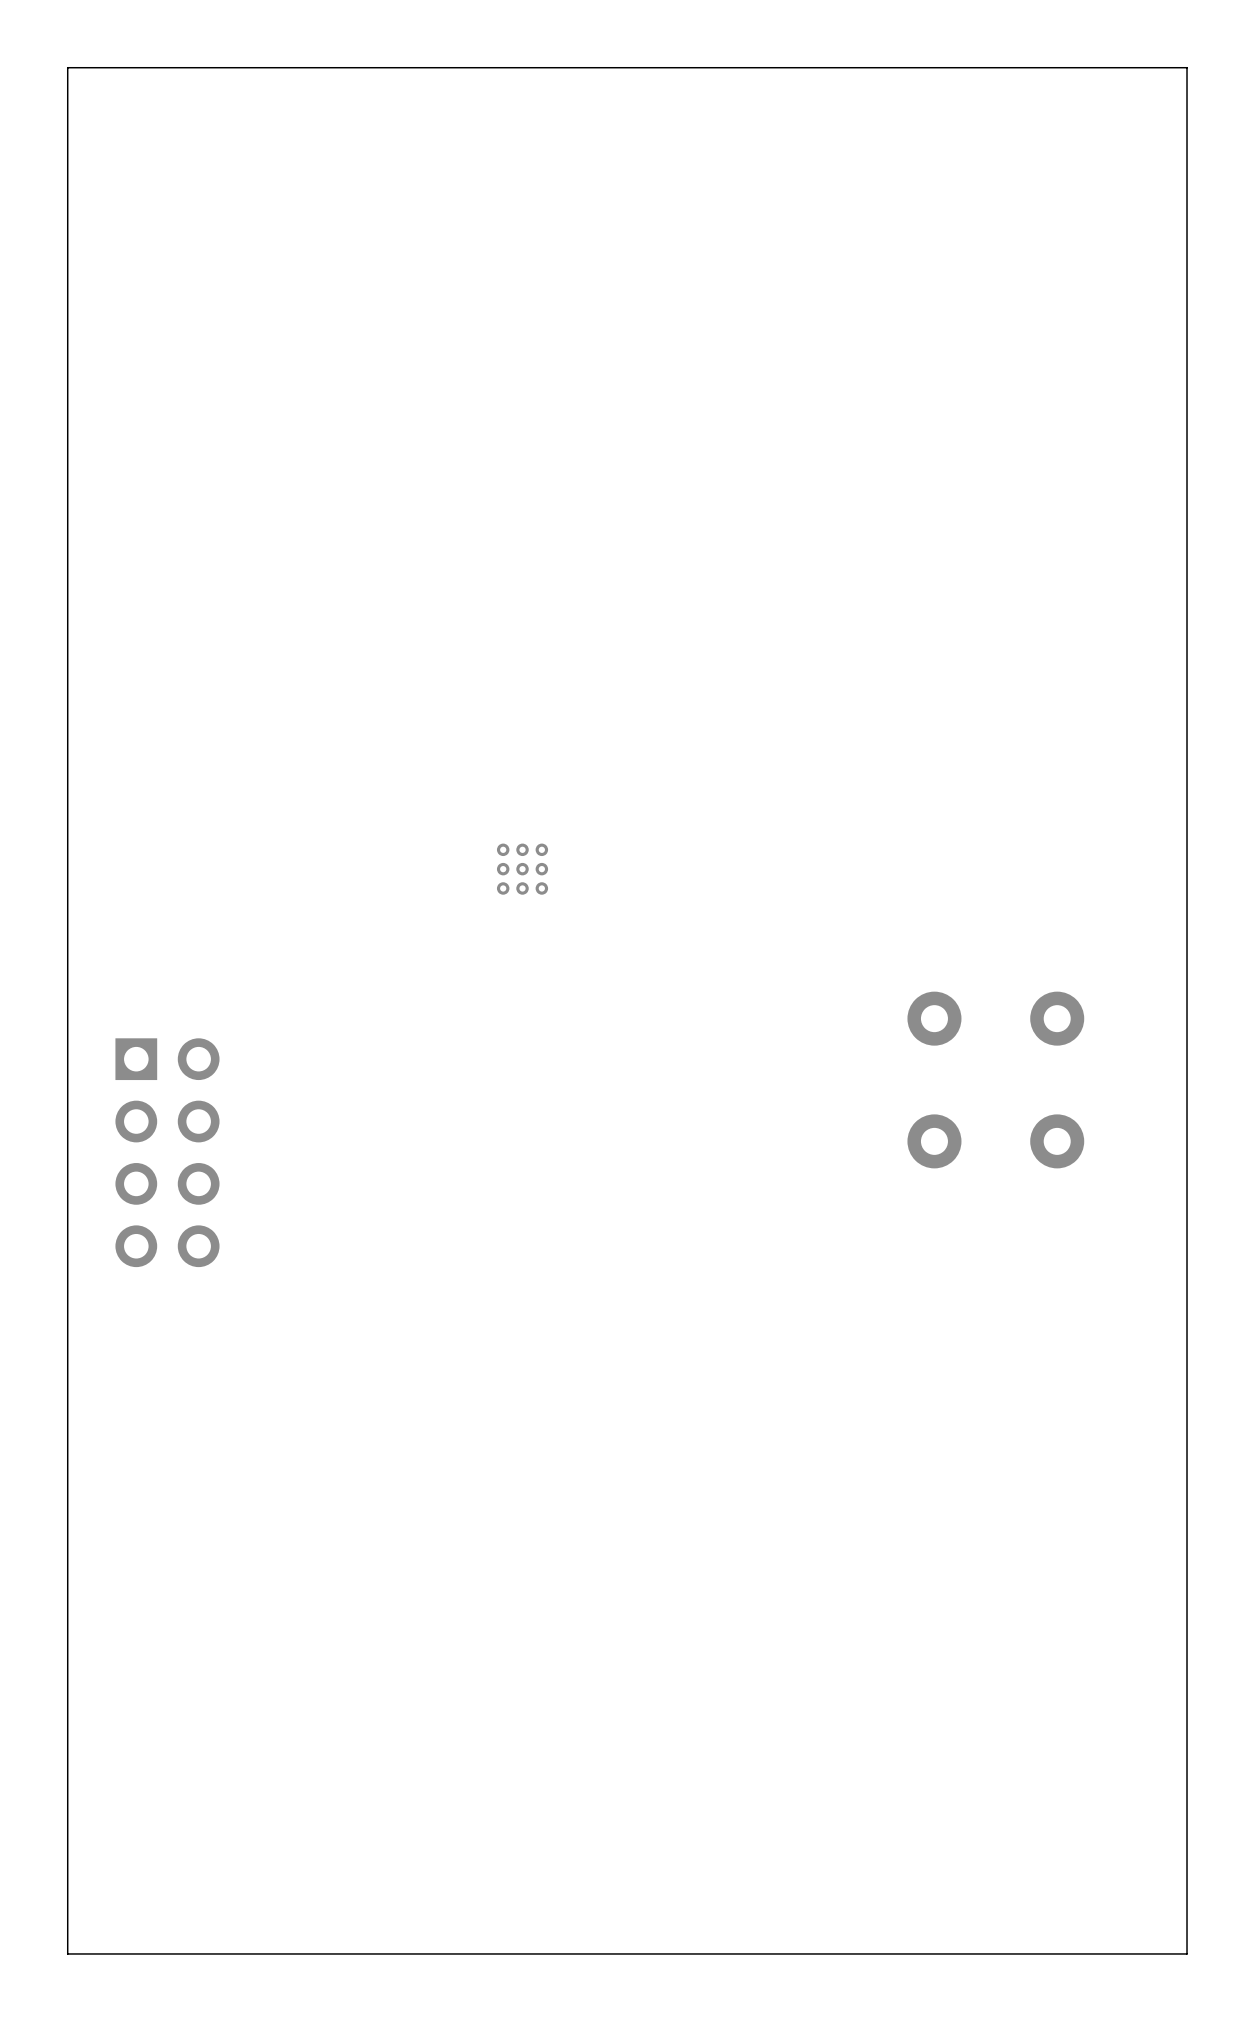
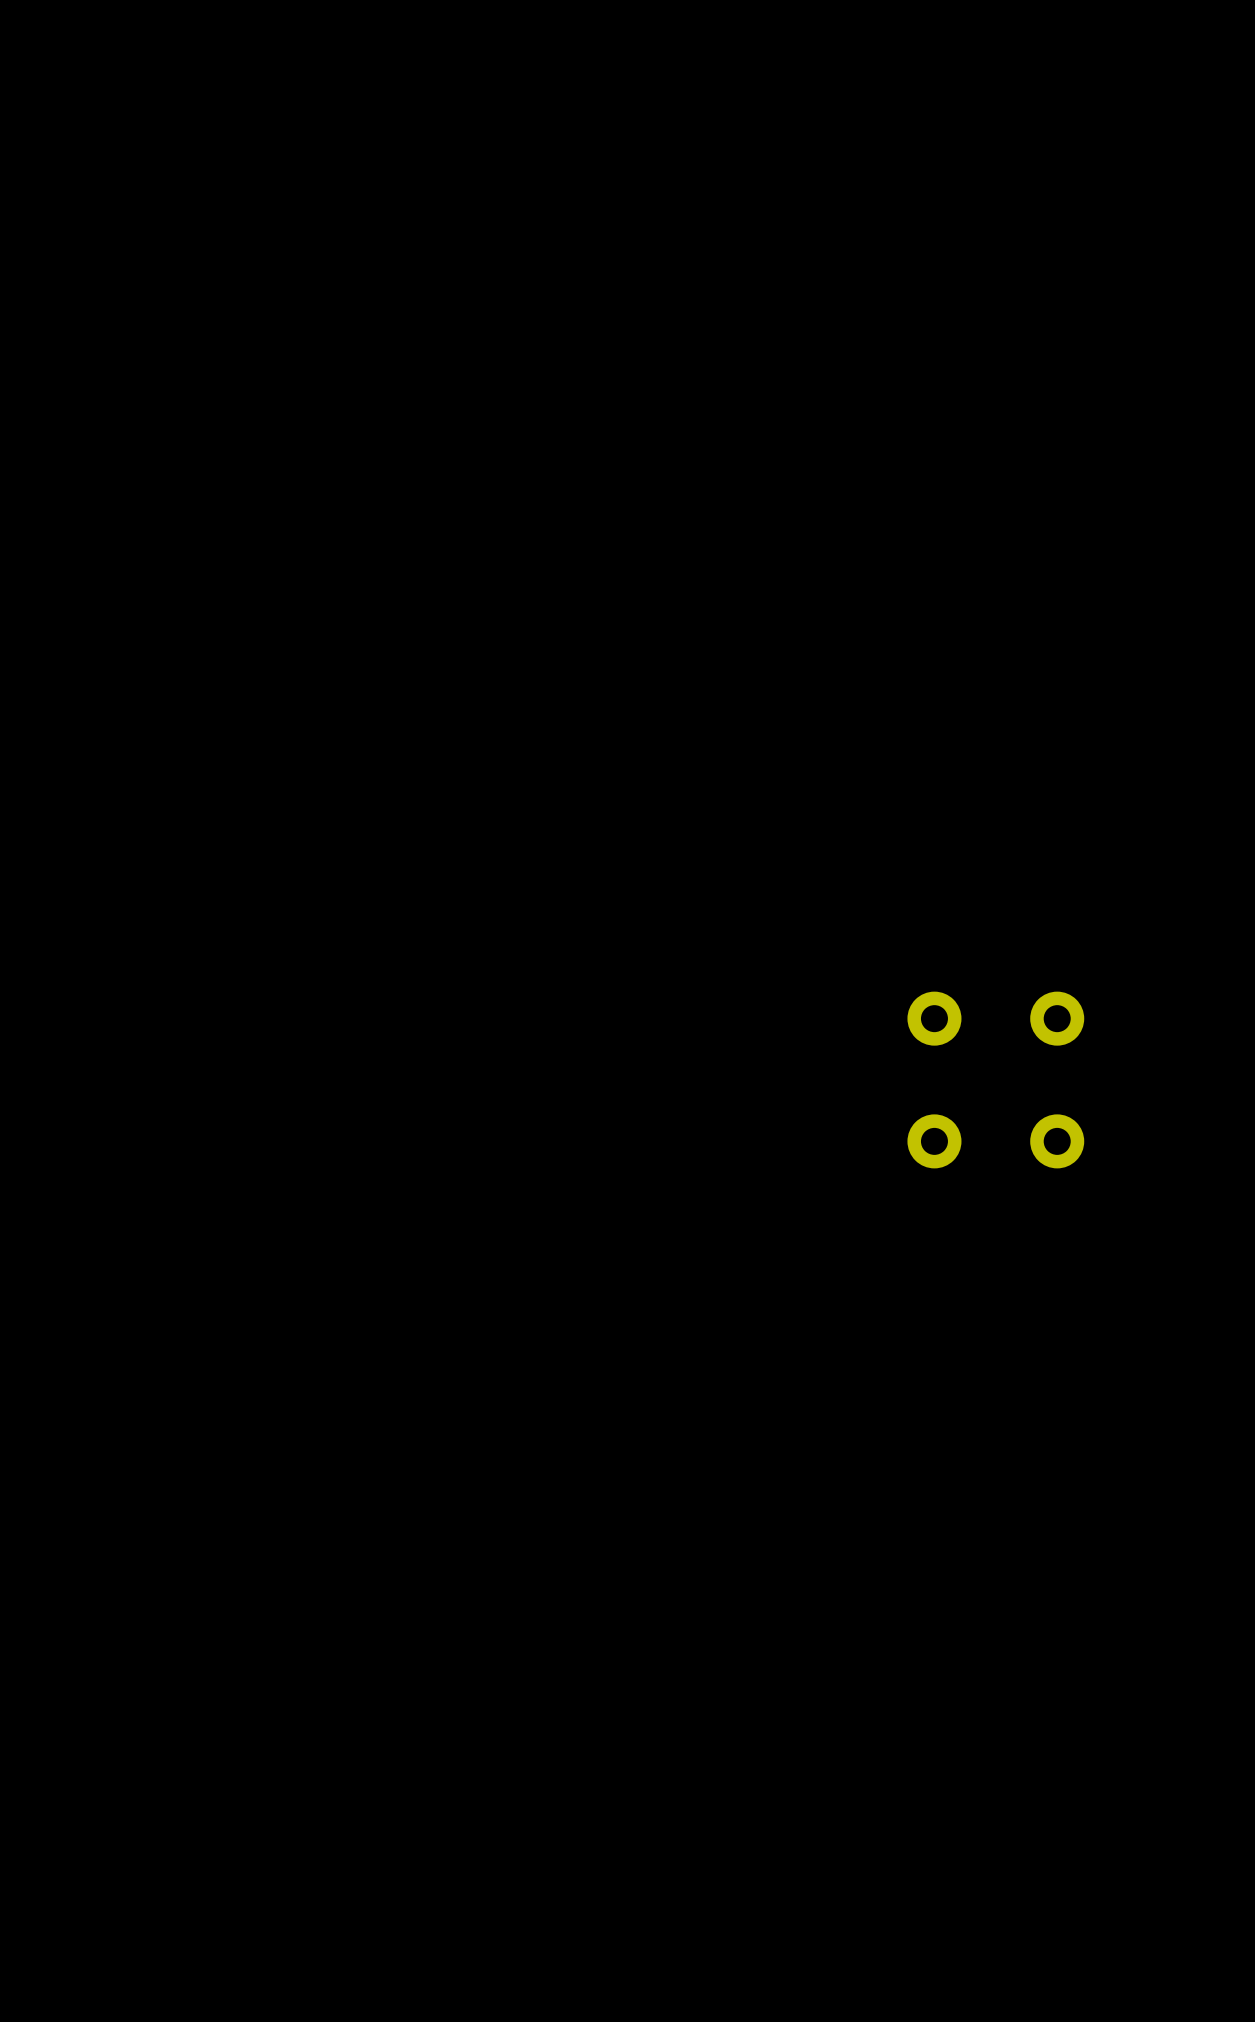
board edge: (1187, 67) (67, 67) (67, 1953) (1187, 1953) (1187, 67) -> none
part: (522, 869) -> none
part: (167, 1152) -> none

